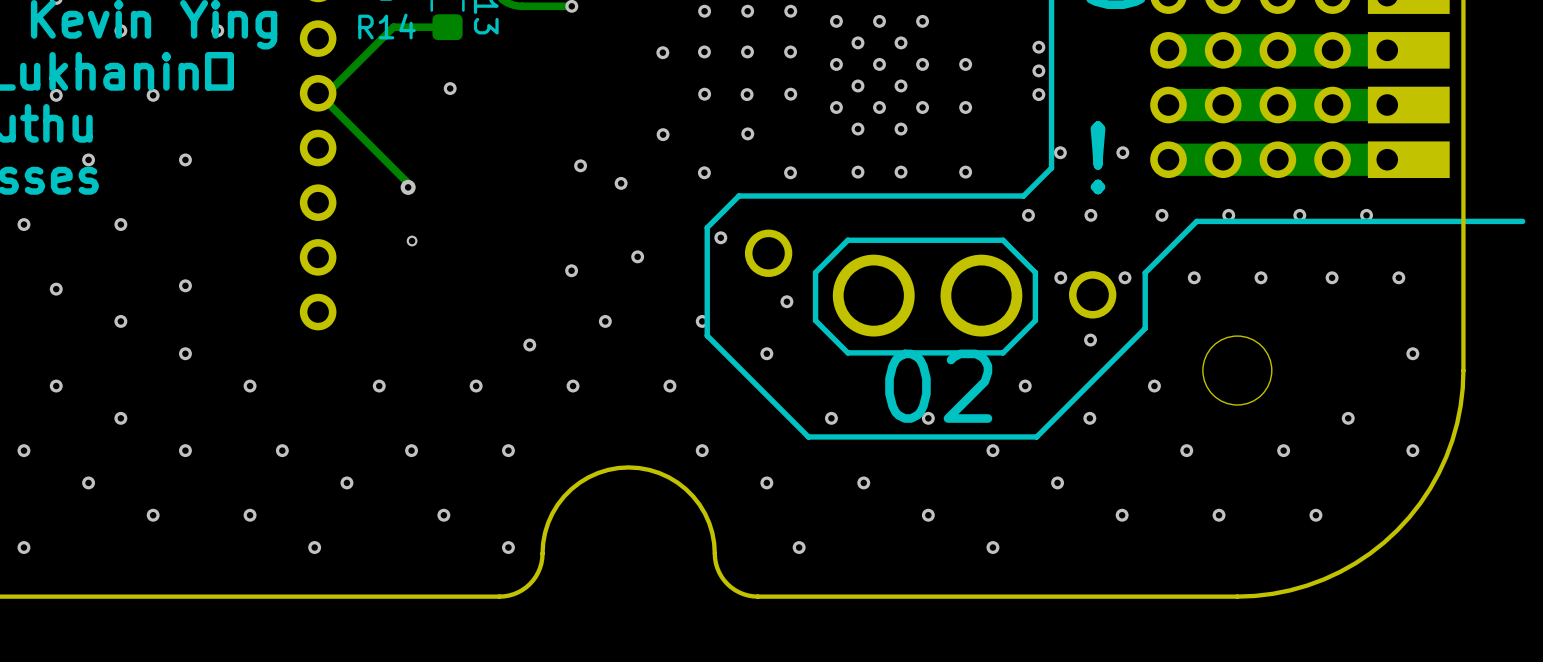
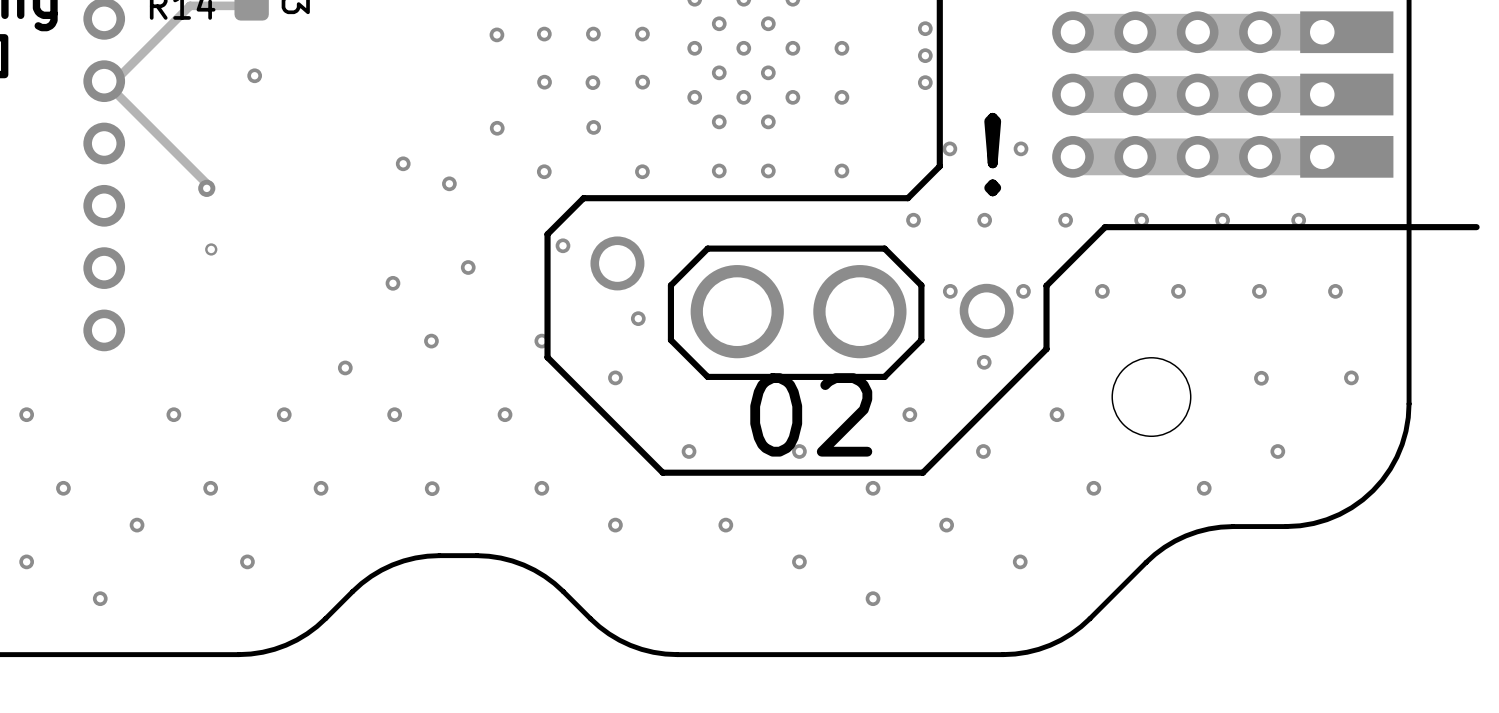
via: none -> (1261, 378)
board edge: (1463, 370) (1457, 423) (1438, 473) (1420, 503) (1397, 530) (1355, 563) (1307, 585) (1272, 593) (1237, 596) (1107, 596) -> (1409, 397) (1405, 431) (1396, 457) (1390, 469) (1373, 490) (1351, 507) (1326, 519) (1300, 525) (1220, 527) (1185, 535) (1155, 554) (1089, 618) (1071, 633) (1038, 649) (1003, 654)
via: none -> (432, 488)
via: (1412, 450) -> none
via: (1219, 515) -> none
via: (1315, 515) -> none
via: (508, 547) -> none
via: (799, 547) -> none
board edge: (821, 596) (753, 596) (734, 590) (724, 580) (719, 572) (709, 523) (693, 496) (677, 482) (659, 473) (628, 467) (598, 473) (579, 482) (564, 496) (548, 523) (538, 572) (529, 584) (522, 590) (504, 596) (436, 596) -> (677, 654) (641, 649) (619, 640) (599, 626) (554, 583) (534, 570) (500, 558) (477, 555) (427, 556) (392, 564) (361, 583) (316, 626) (296, 640) (274, 649) (238, 654)

